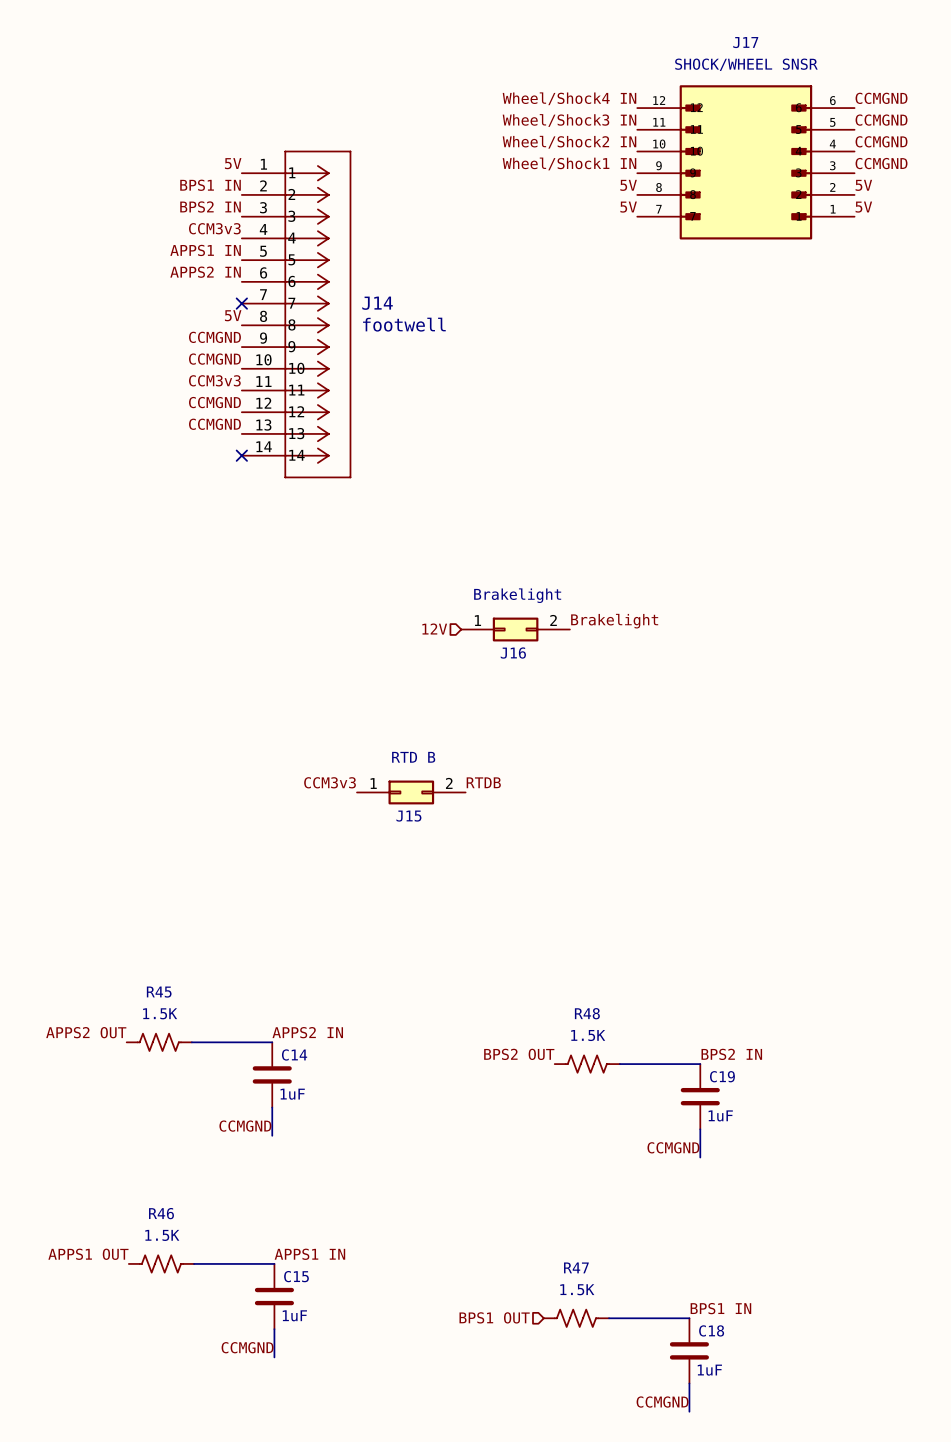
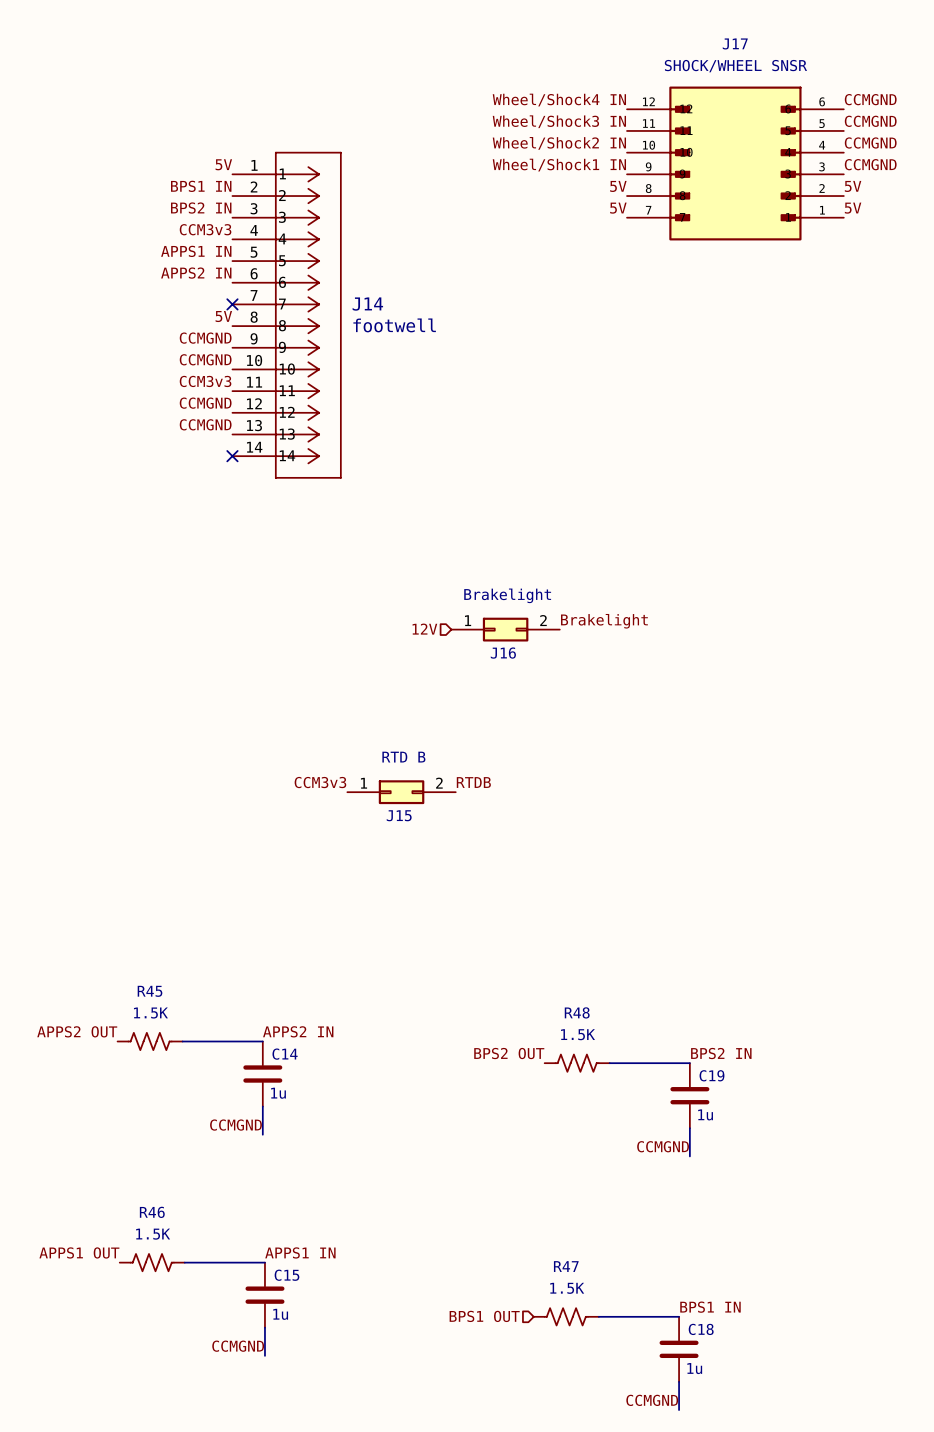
C14 value: 1uF (292, 1094) -> 1u (278, 1093)
C19 value: 1uF (720, 1115) -> 1u (705, 1114)
C15 value: 1uF (294, 1315) -> 1u (280, 1314)
C18 value: 1uF (709, 1370) -> 1u (694, 1368)

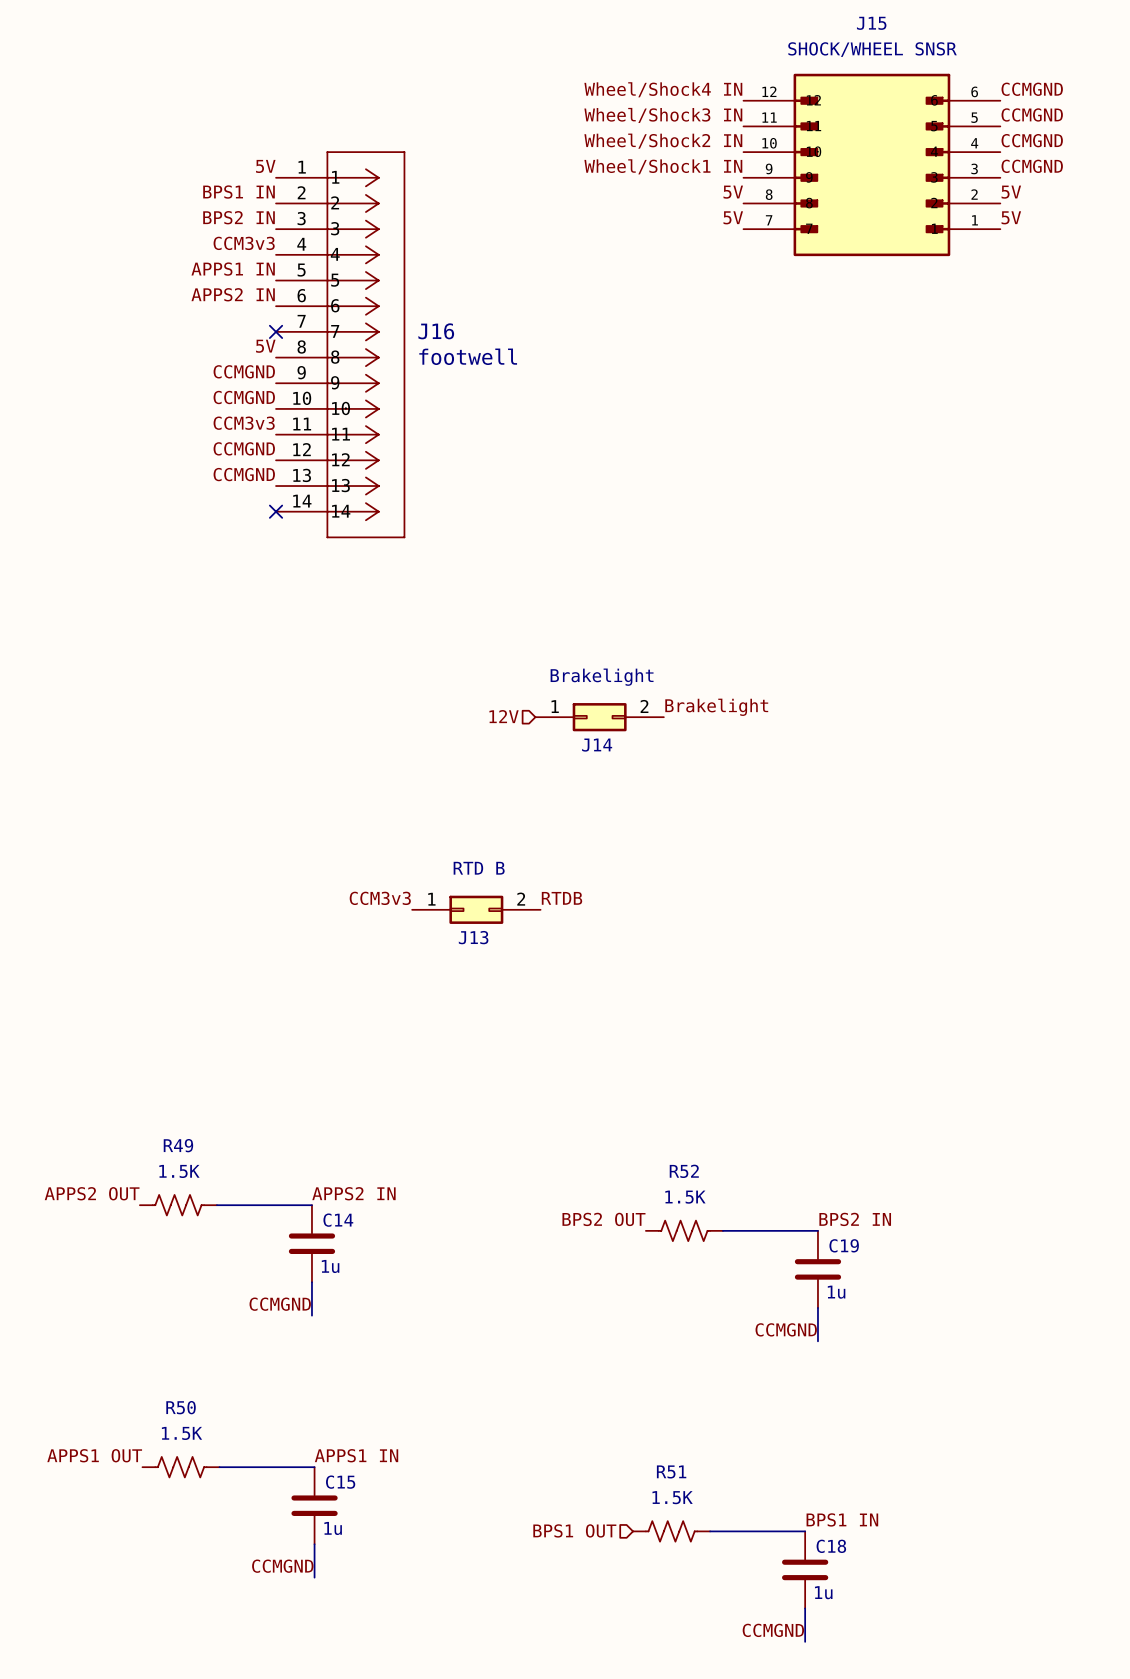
J17 name: J17 (735, 43) -> J15 (871, 23)
J14 name: J14 (367, 304) -> J16 (436, 331)
J16 name: J16 (503, 653) -> J14 (597, 745)
J15 name: J15 (399, 815) -> J13 (473, 937)
R45 name: R45 (150, 991) -> R49 (178, 1145)
R48 name: R48 (577, 1012) -> R52 (684, 1171)
R46 name: R46 (152, 1212) -> R50 (181, 1407)
R47 name: R47 (566, 1266) -> R51 (671, 1471)

